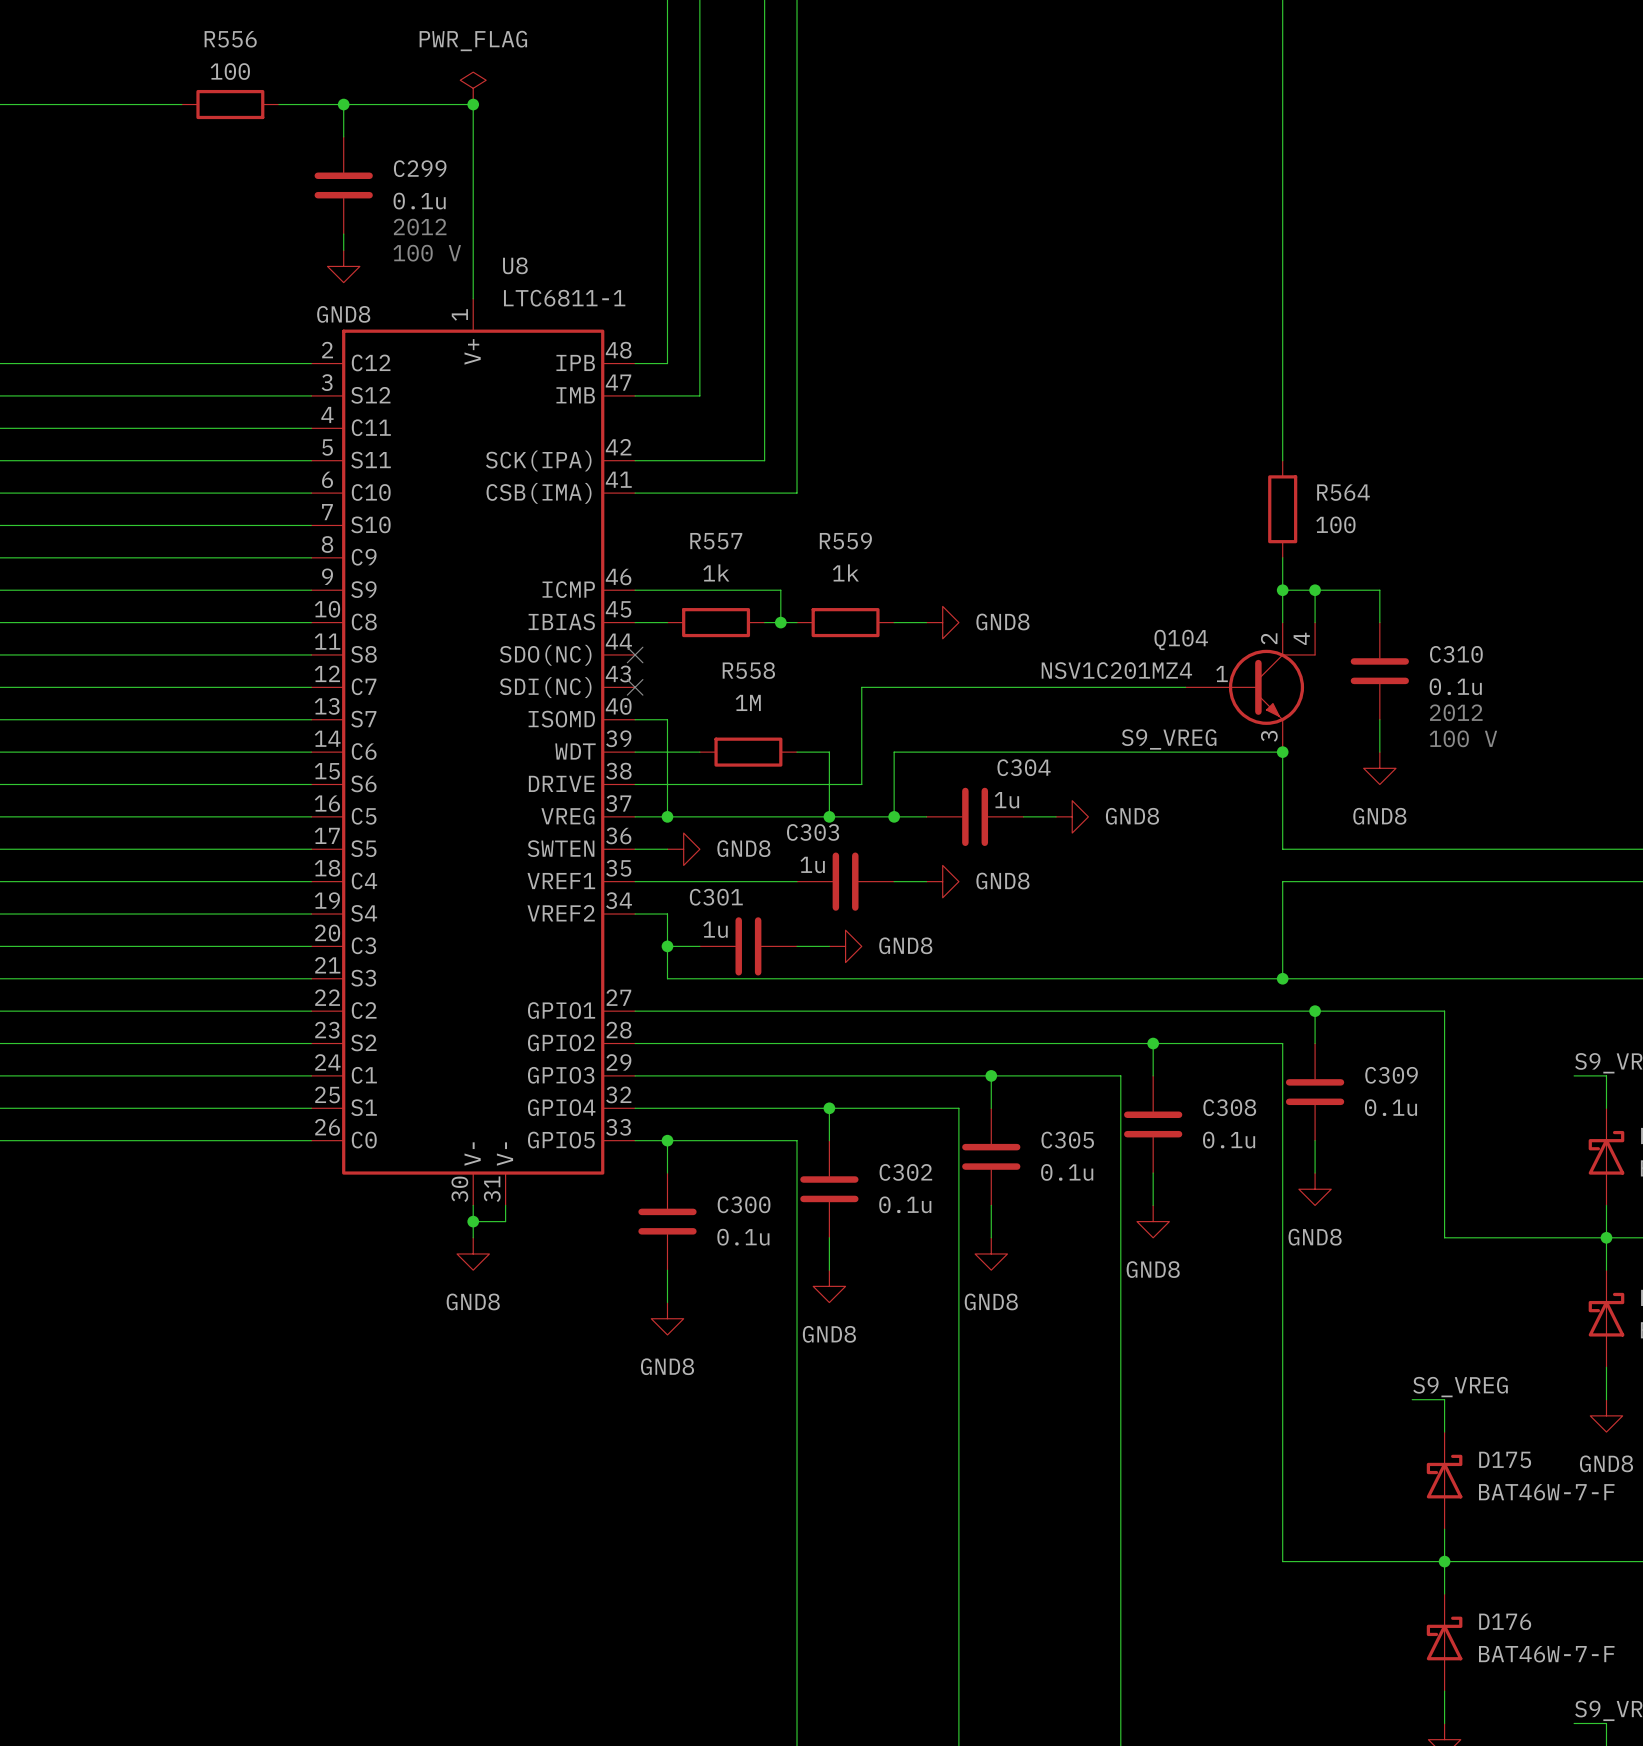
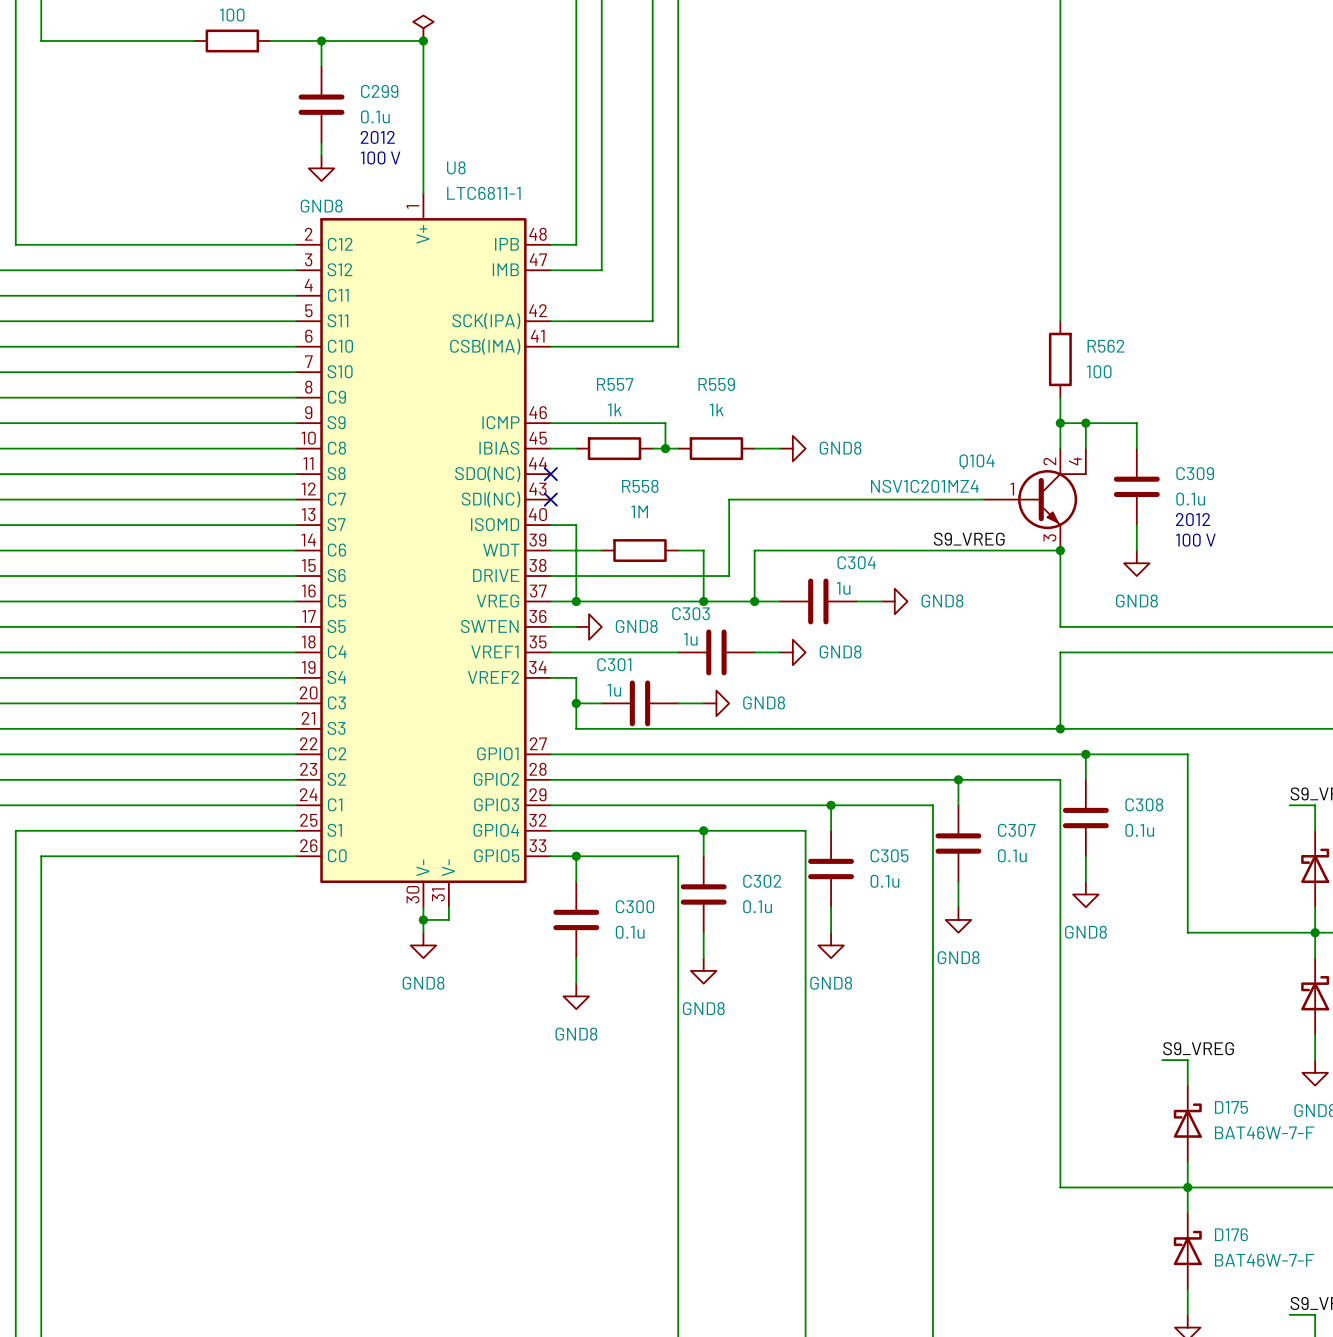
R564 name: R564 (1343, 492) -> R562 (1105, 346)
C310 name: C310 (1456, 654) -> C309 (1195, 473)
C309 name: C309 (1391, 1075) -> C308 (1144, 804)
C308 name: C308 (1229, 1107) -> C307 (1016, 830)

